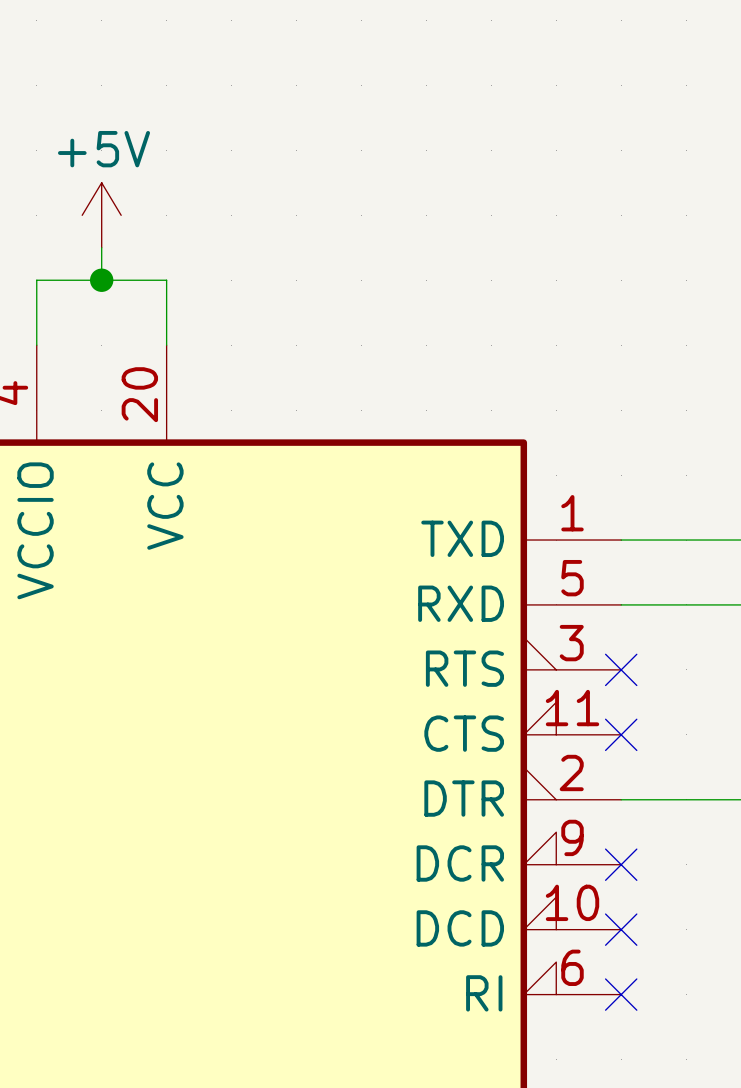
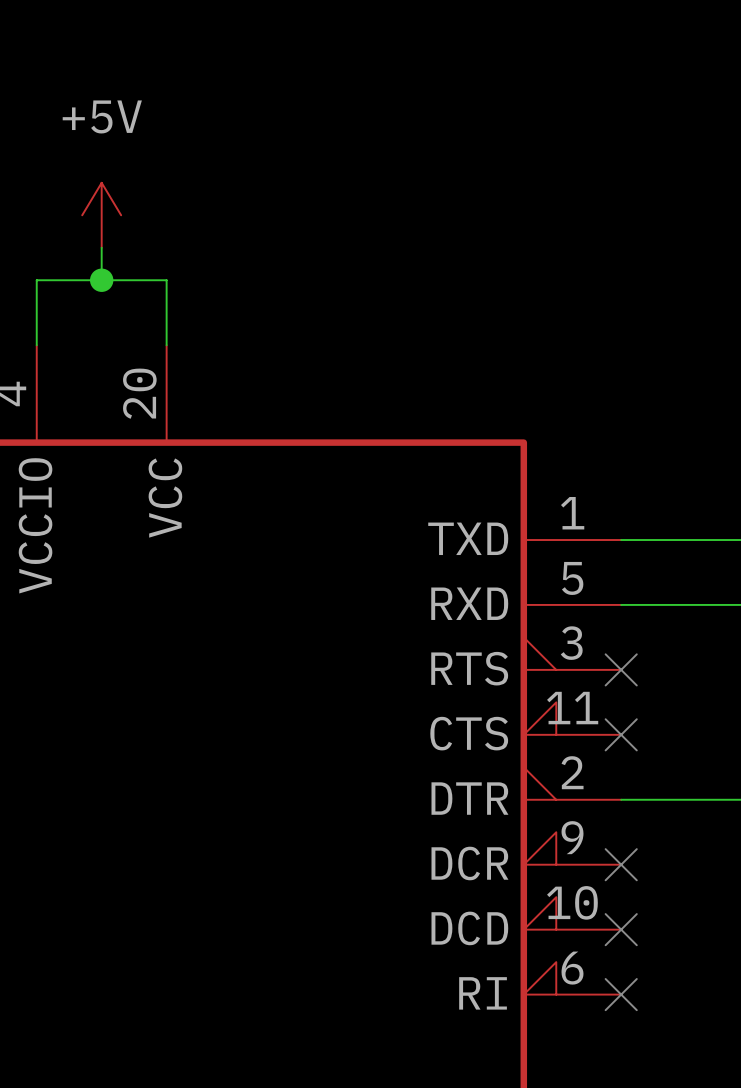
power symbol text position: +5V (104, 149) -> +5V (102, 116)

